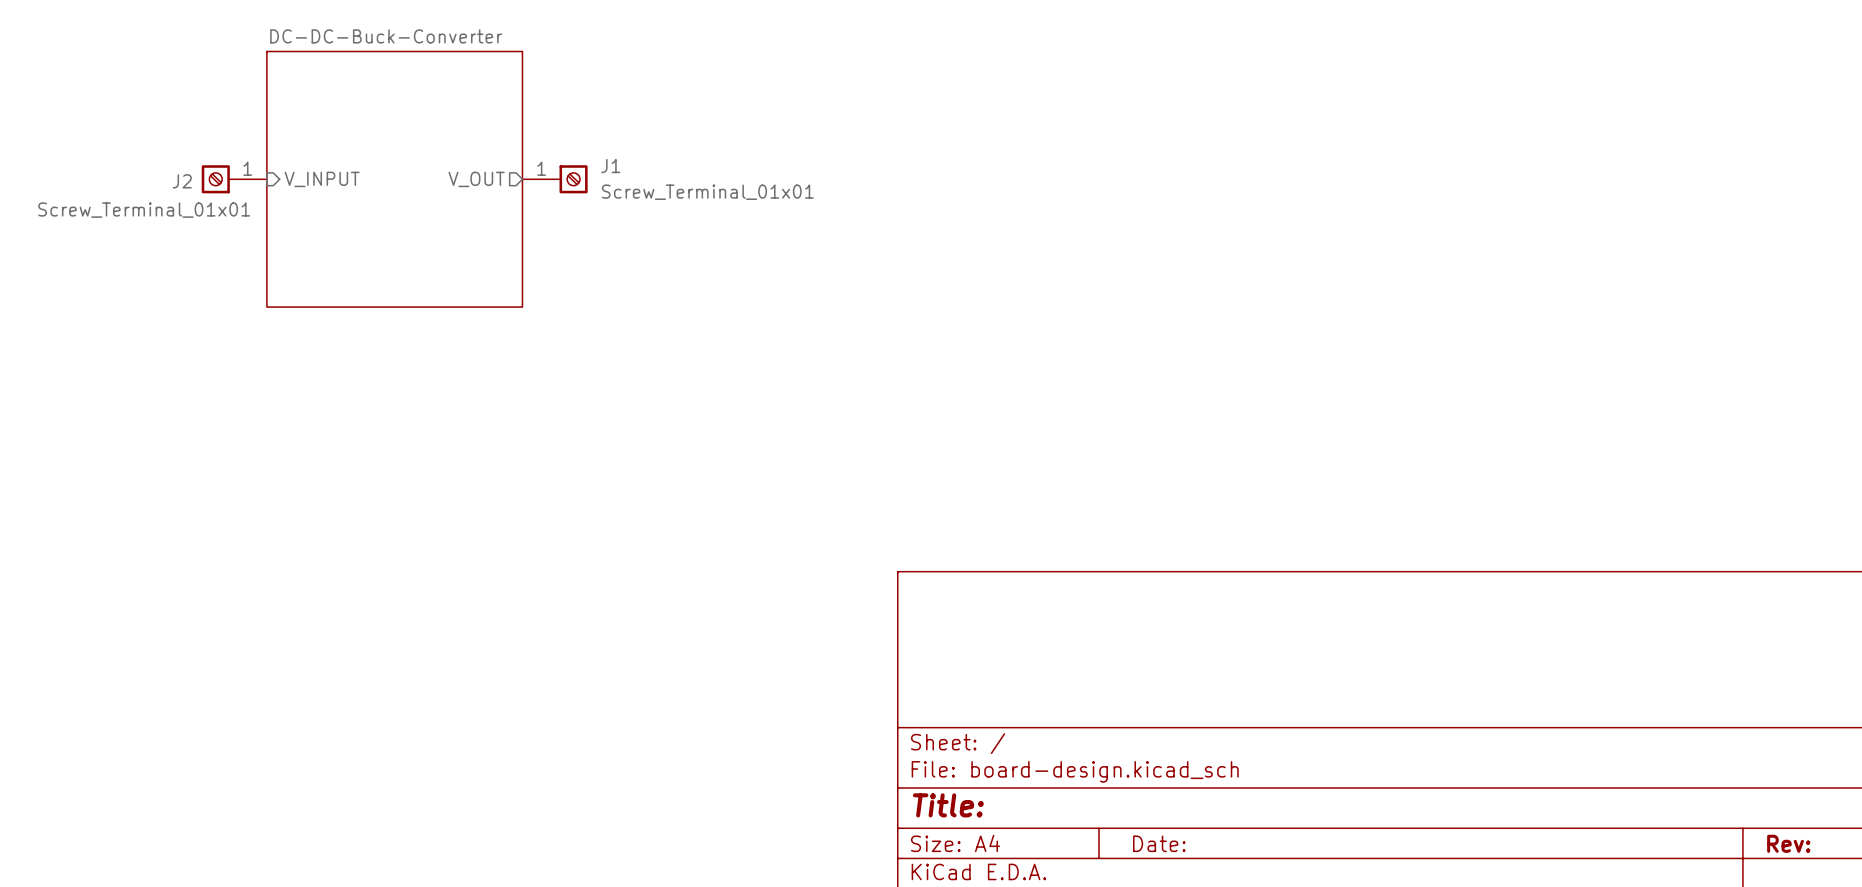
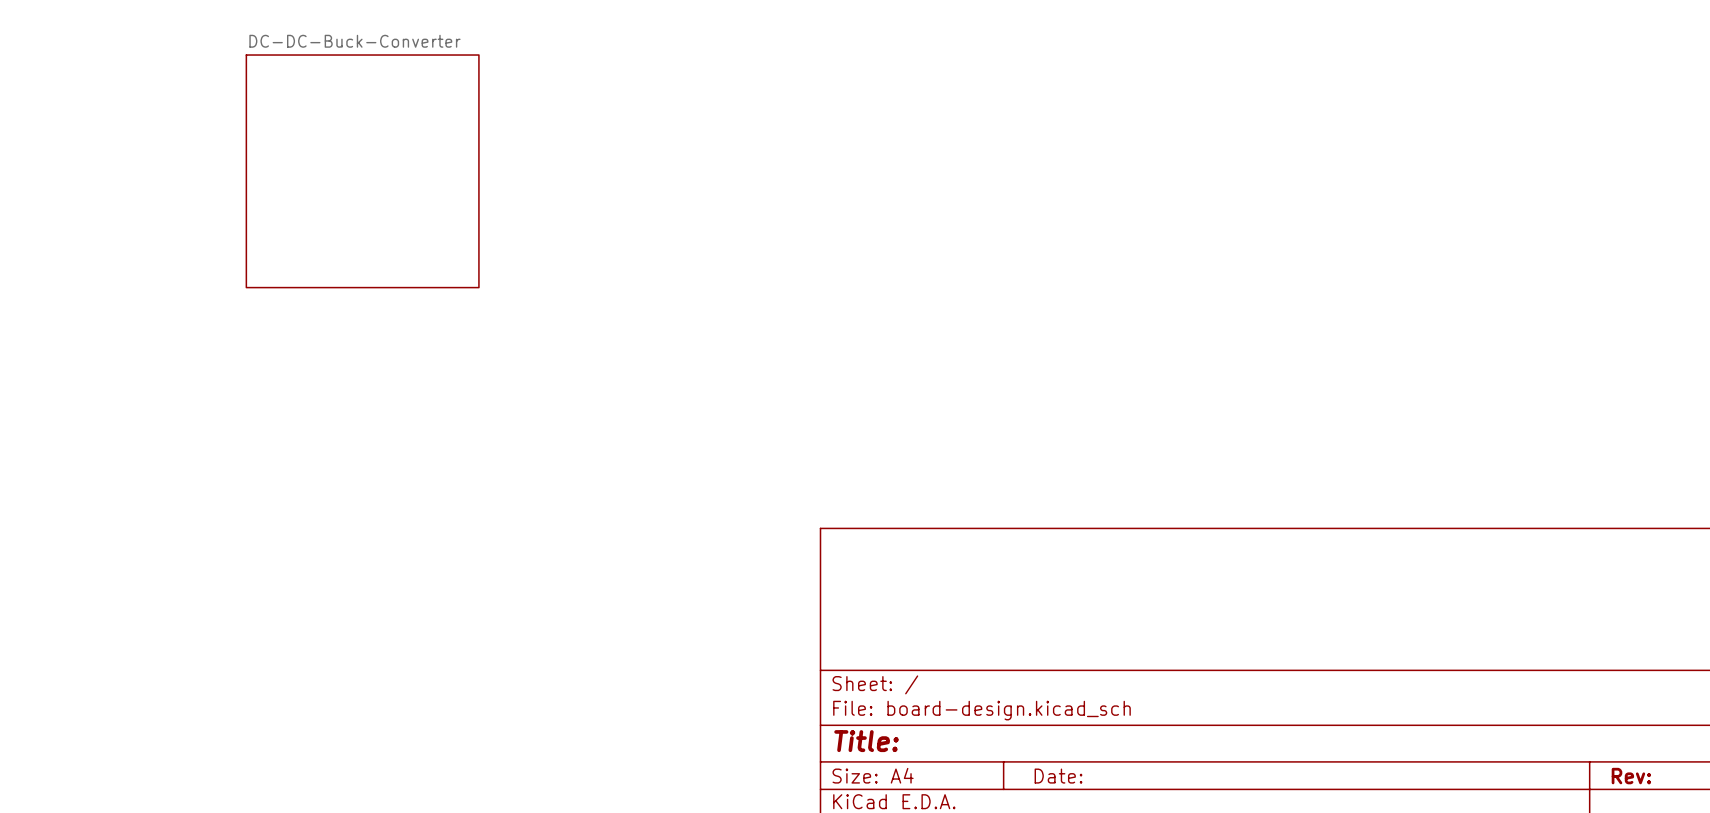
J2: Screw_Terminal_01x01 (234, 179) -> none
sheet pin: V_INPUT (322, 179) -> none
sheet pin: V_OUT (476, 179) -> none
J1: Screw_Terminal_01x01 (555, 179) -> none

